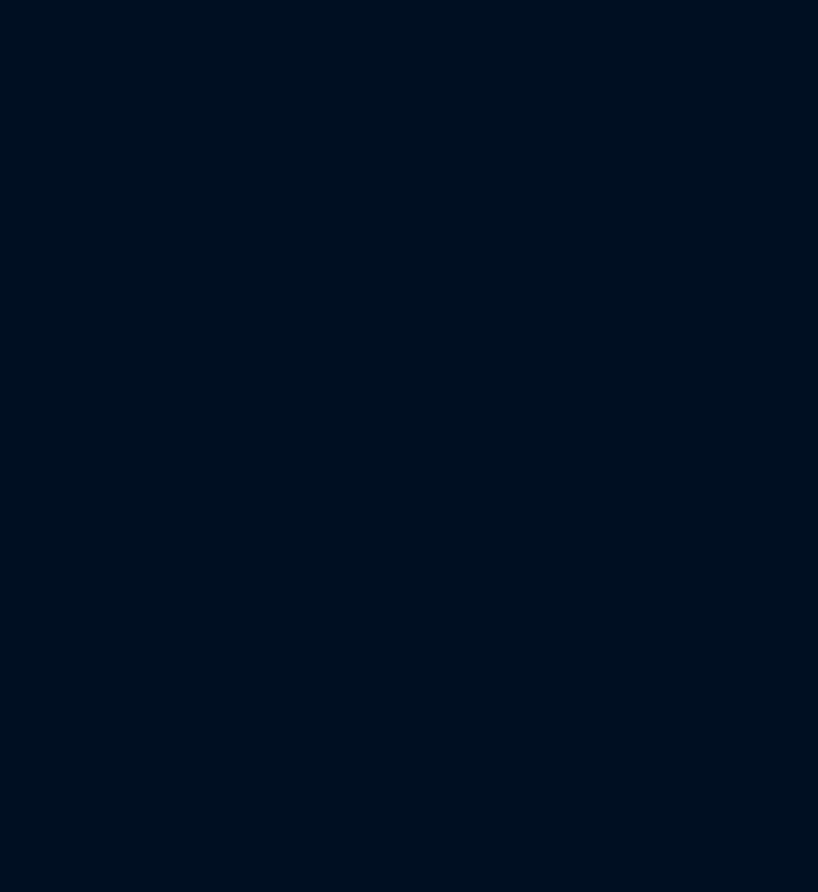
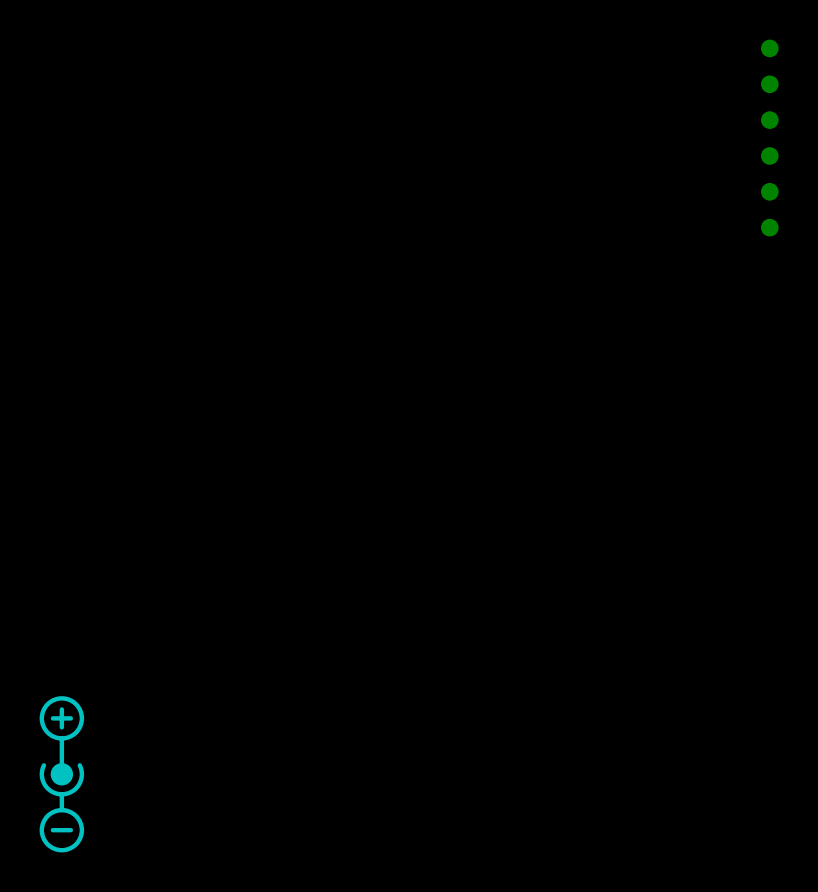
part: none -> (769, 48)
part: none -> (769, 84)
part: none -> (769, 120)
part: none -> (769, 155)
part: none -> (769, 191)
part: none -> (769, 227)
drawing: none -> [39, 696, 85, 741]
line: none -> (61, 709) (61, 727)
line: none -> (52, 718) (70, 718)
line: none -> (61, 738) (61, 774)
drawing: none -> [50, 763, 74, 786]
line: none -> (43, 765) (41, 775) (44, 784) (52, 791) (61, 794) (71, 791) (78, 784) (81, 775) (79, 765)
line: none -> (61, 794) (61, 810)
drawing: none -> [39, 807, 85, 853]
line: none -> (52, 830) (70, 830)

